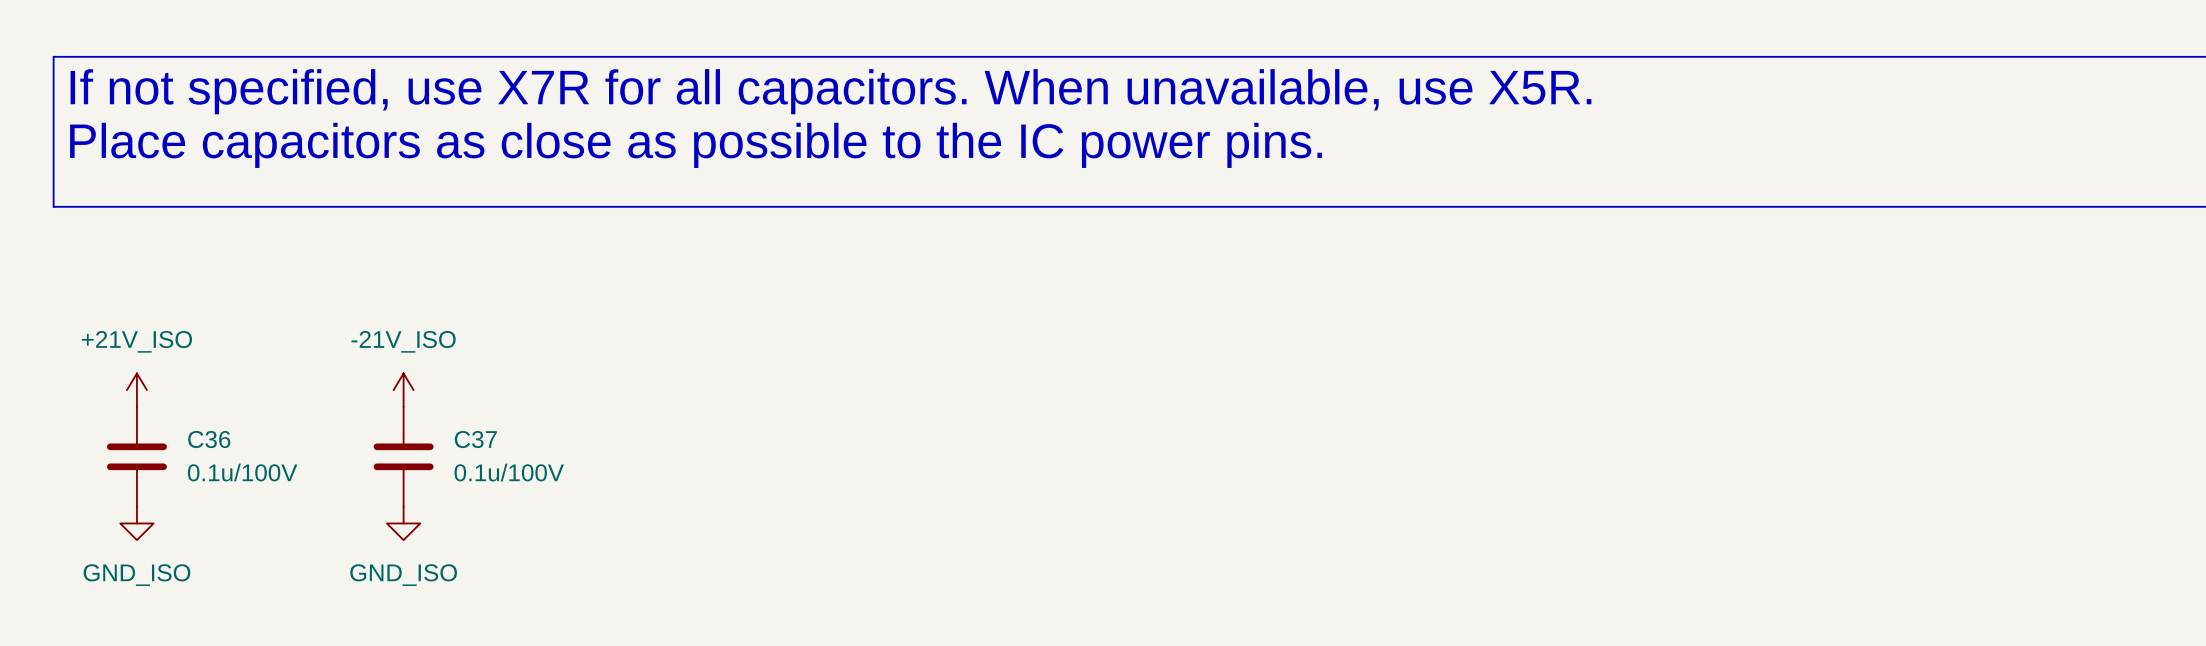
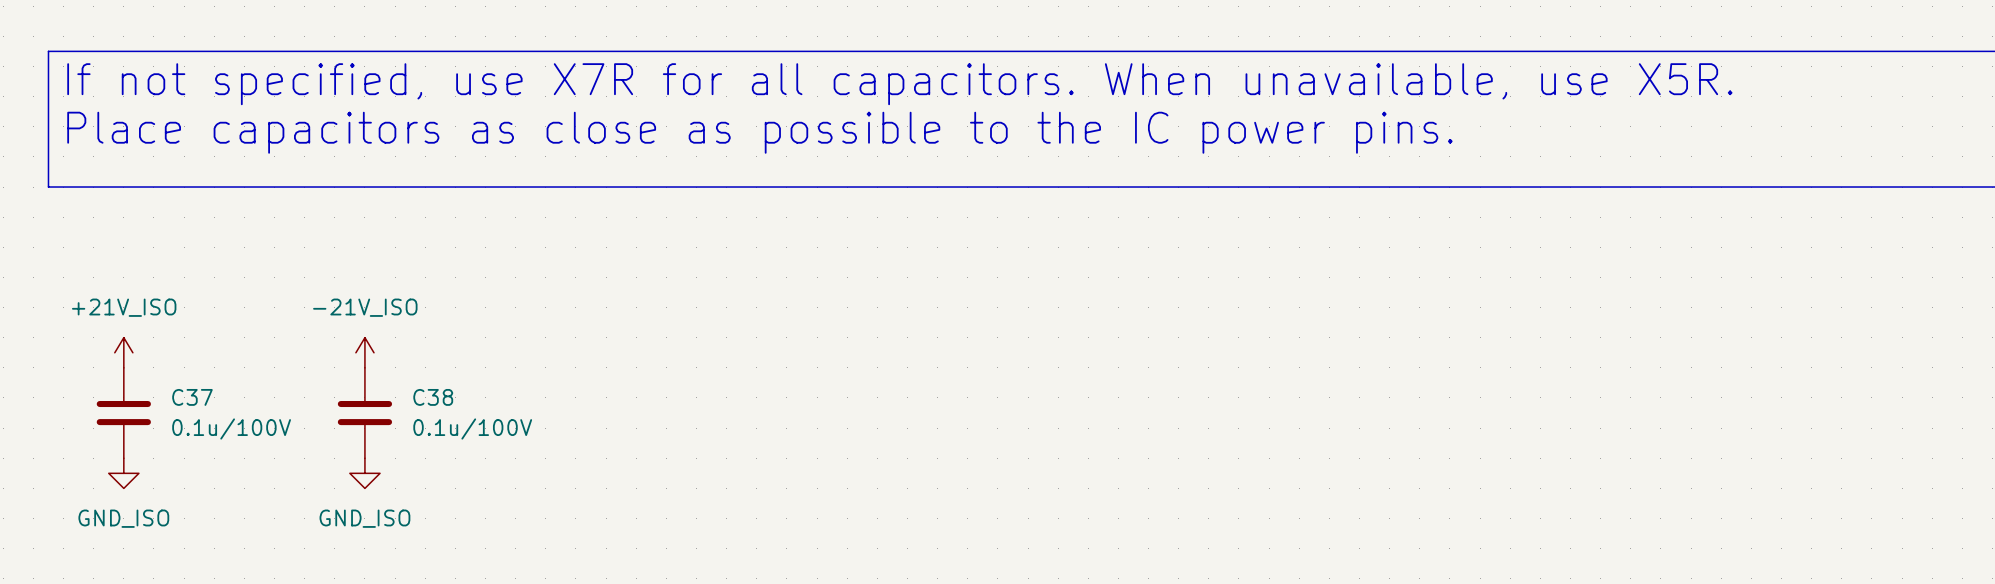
C36 name: C36 (209, 439) -> C37 (192, 397)
C37 name: C37 (475, 439) -> C38 (433, 397)

